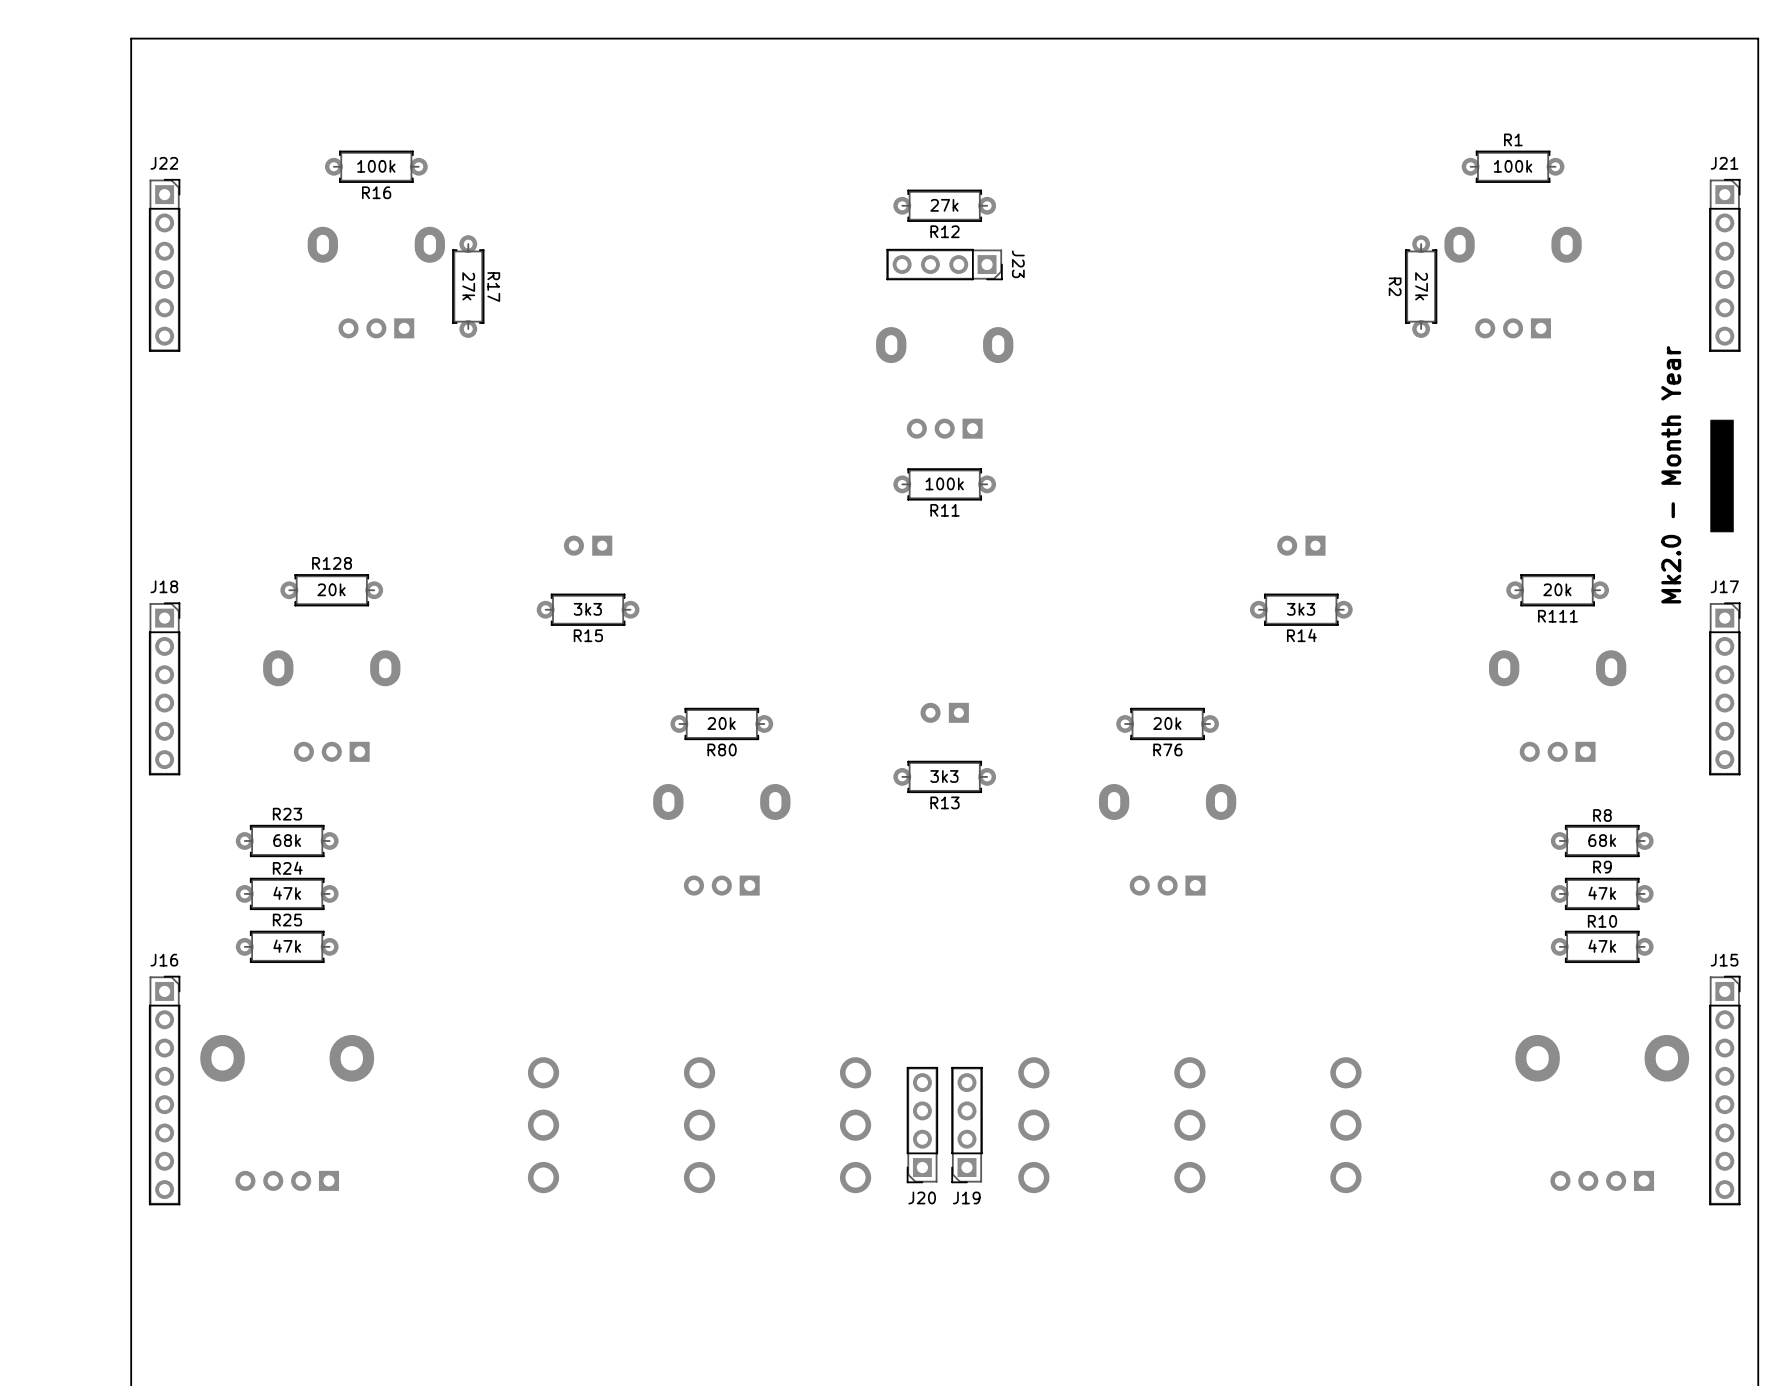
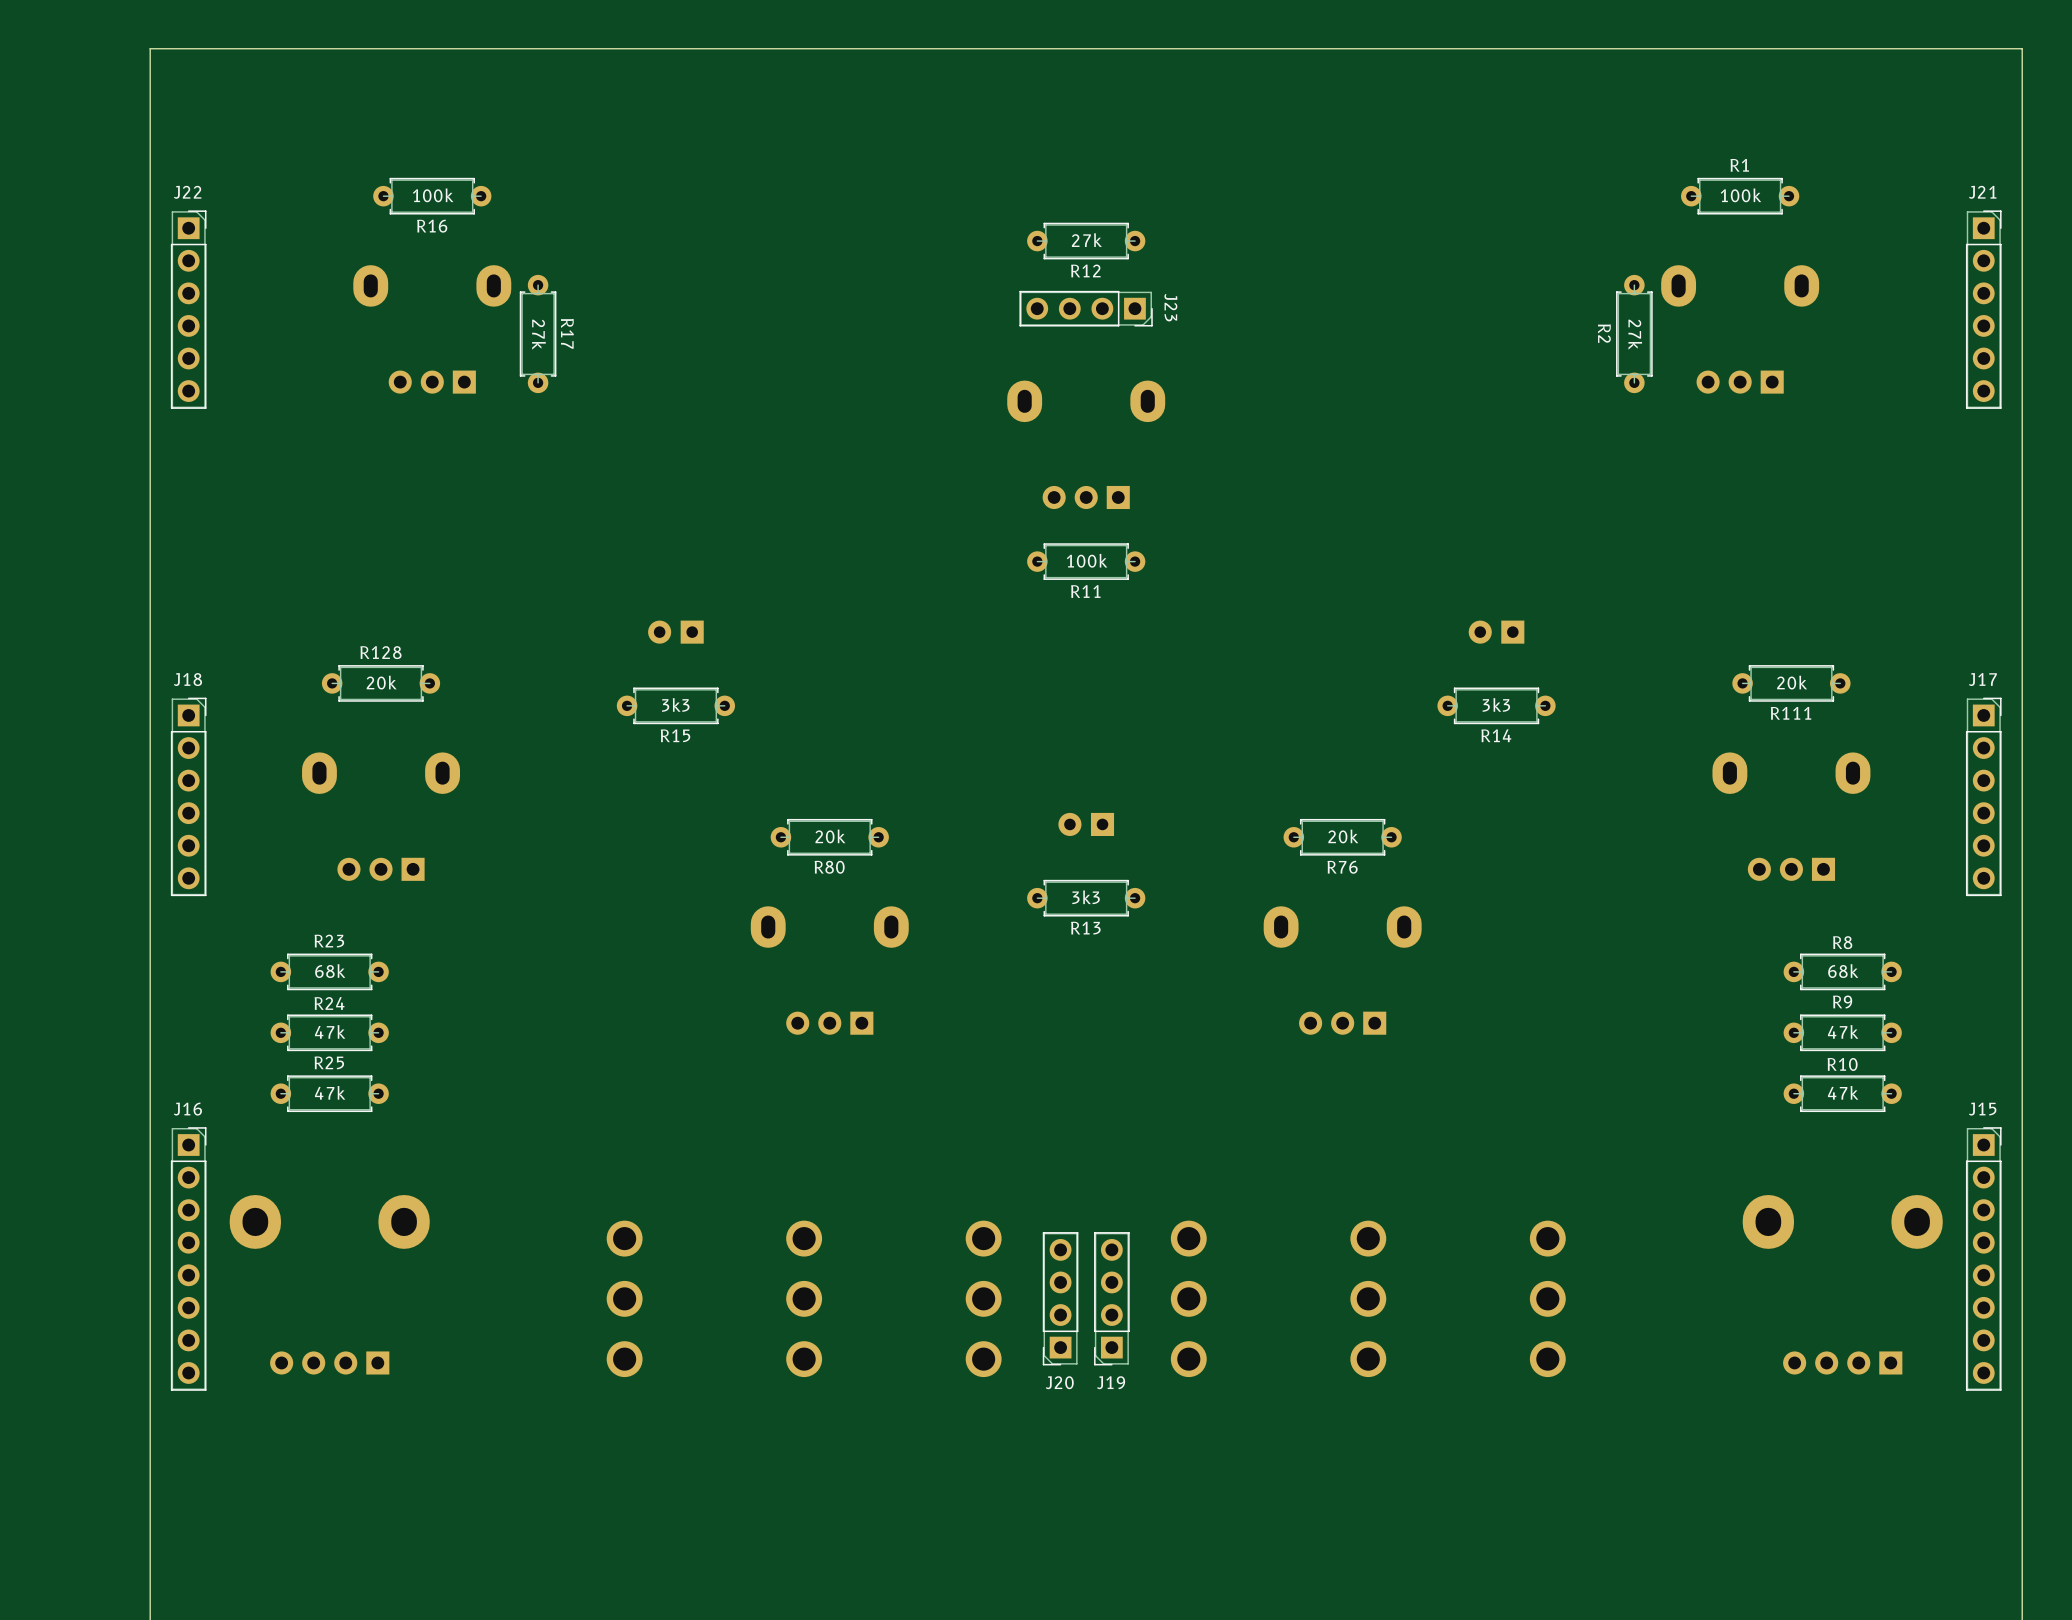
drawing: [1710, 419, 1734, 533] -> none
text: Mk2.0 - Month Year (1671, 474) -> none

